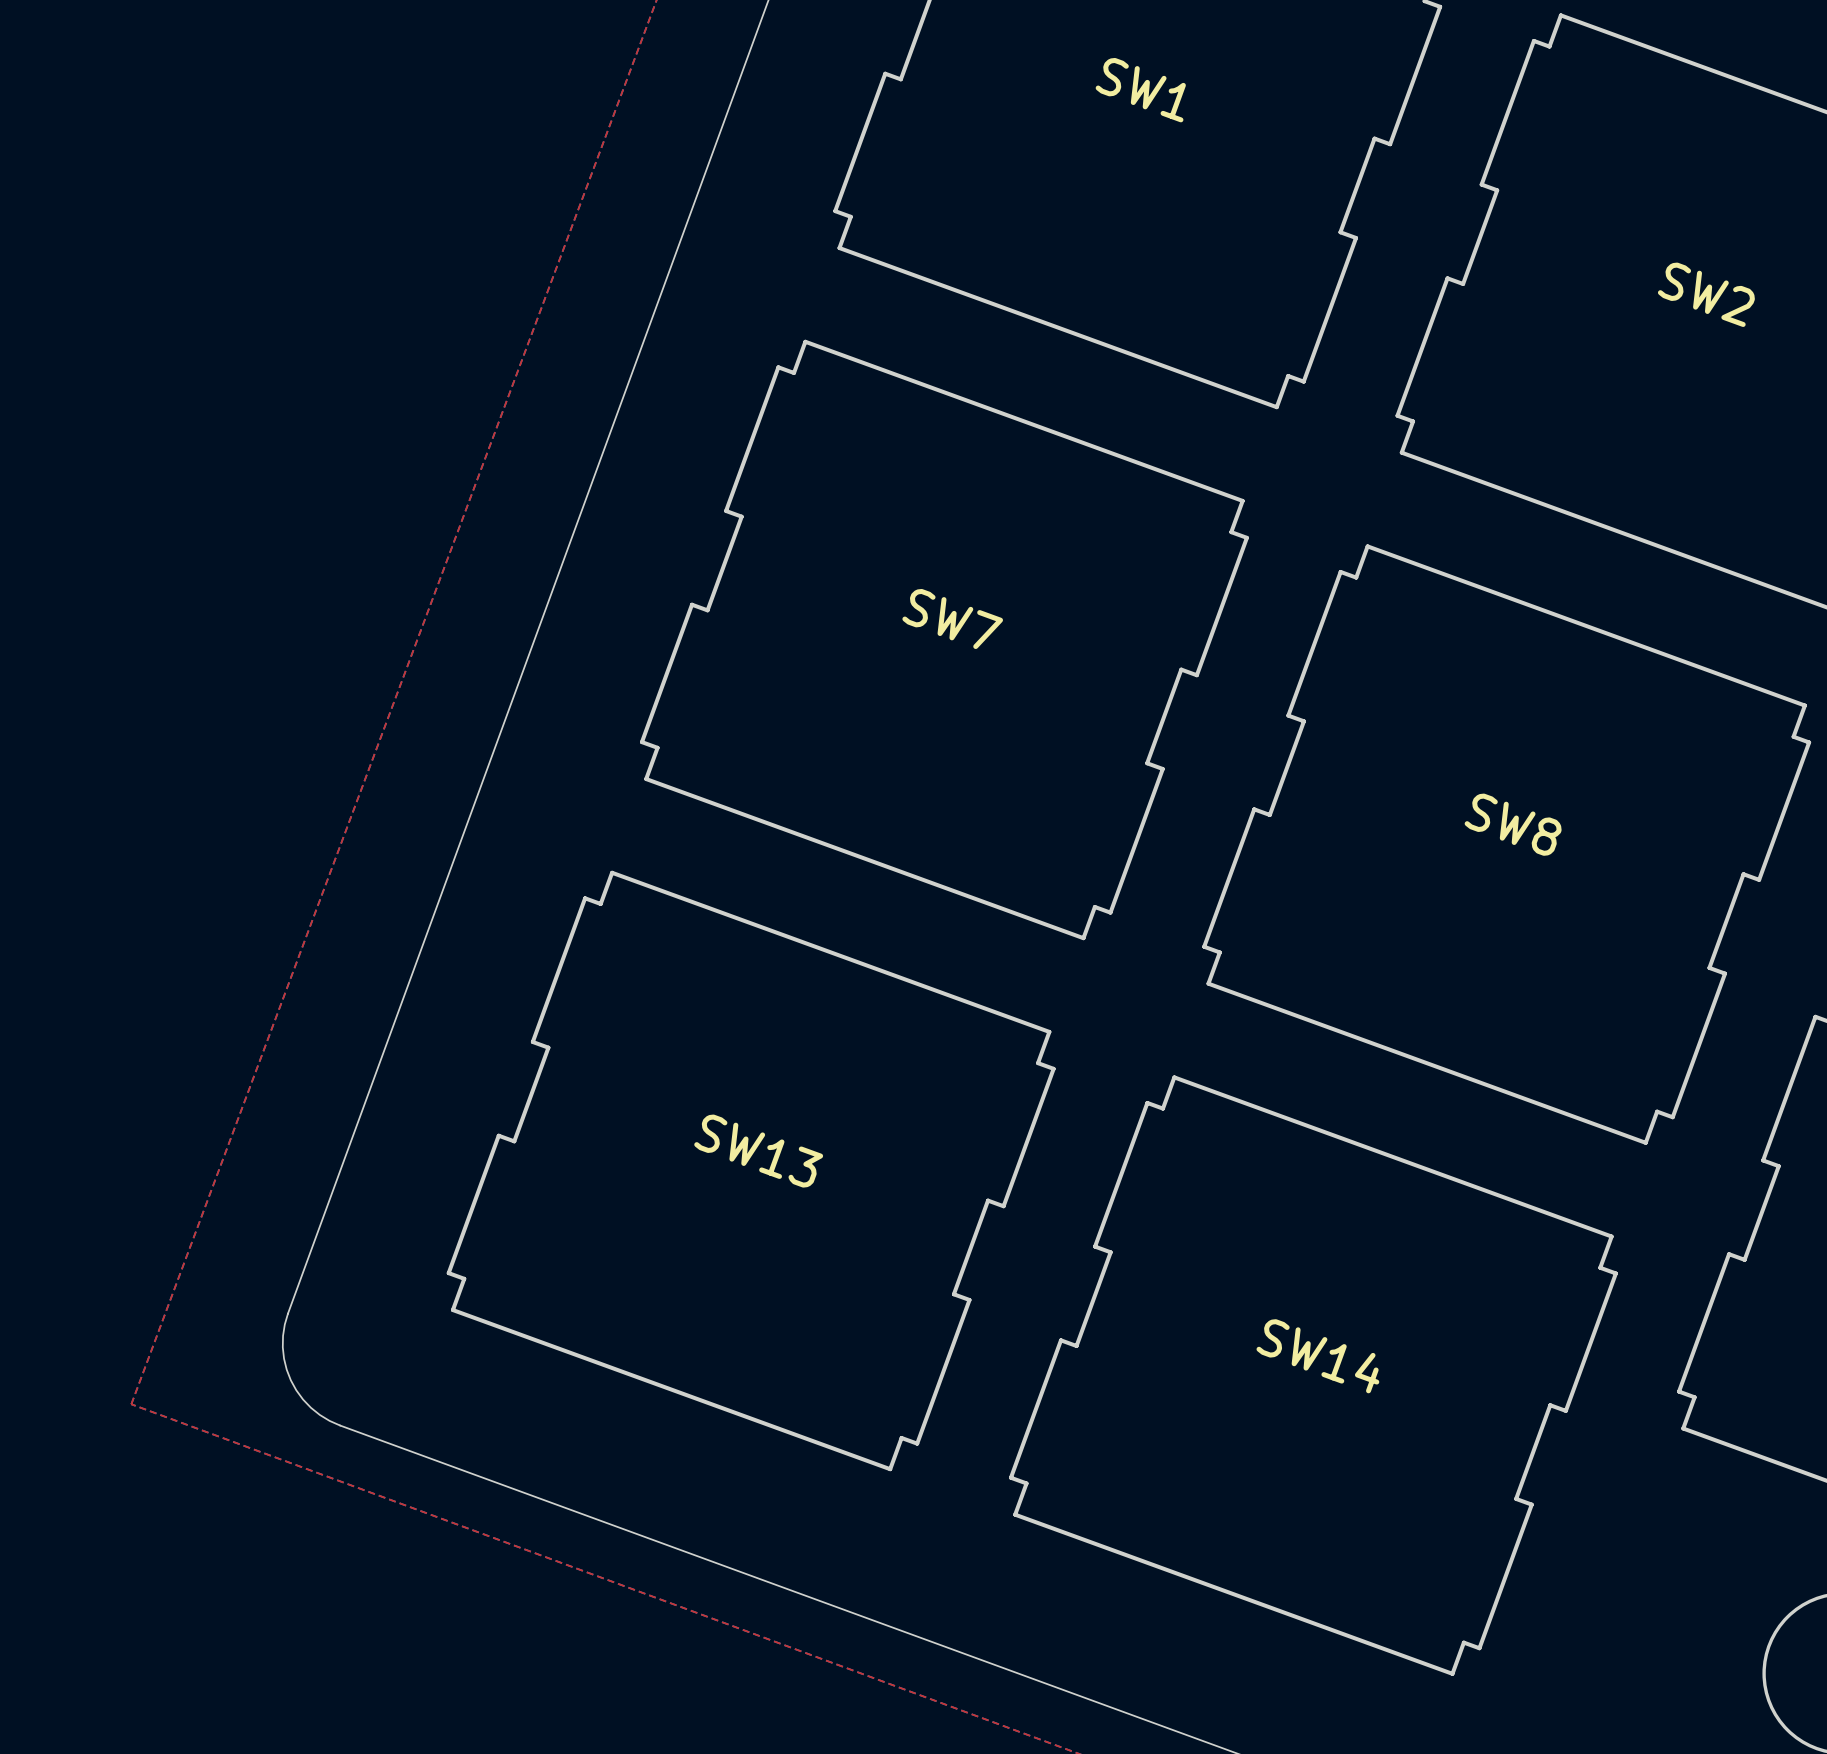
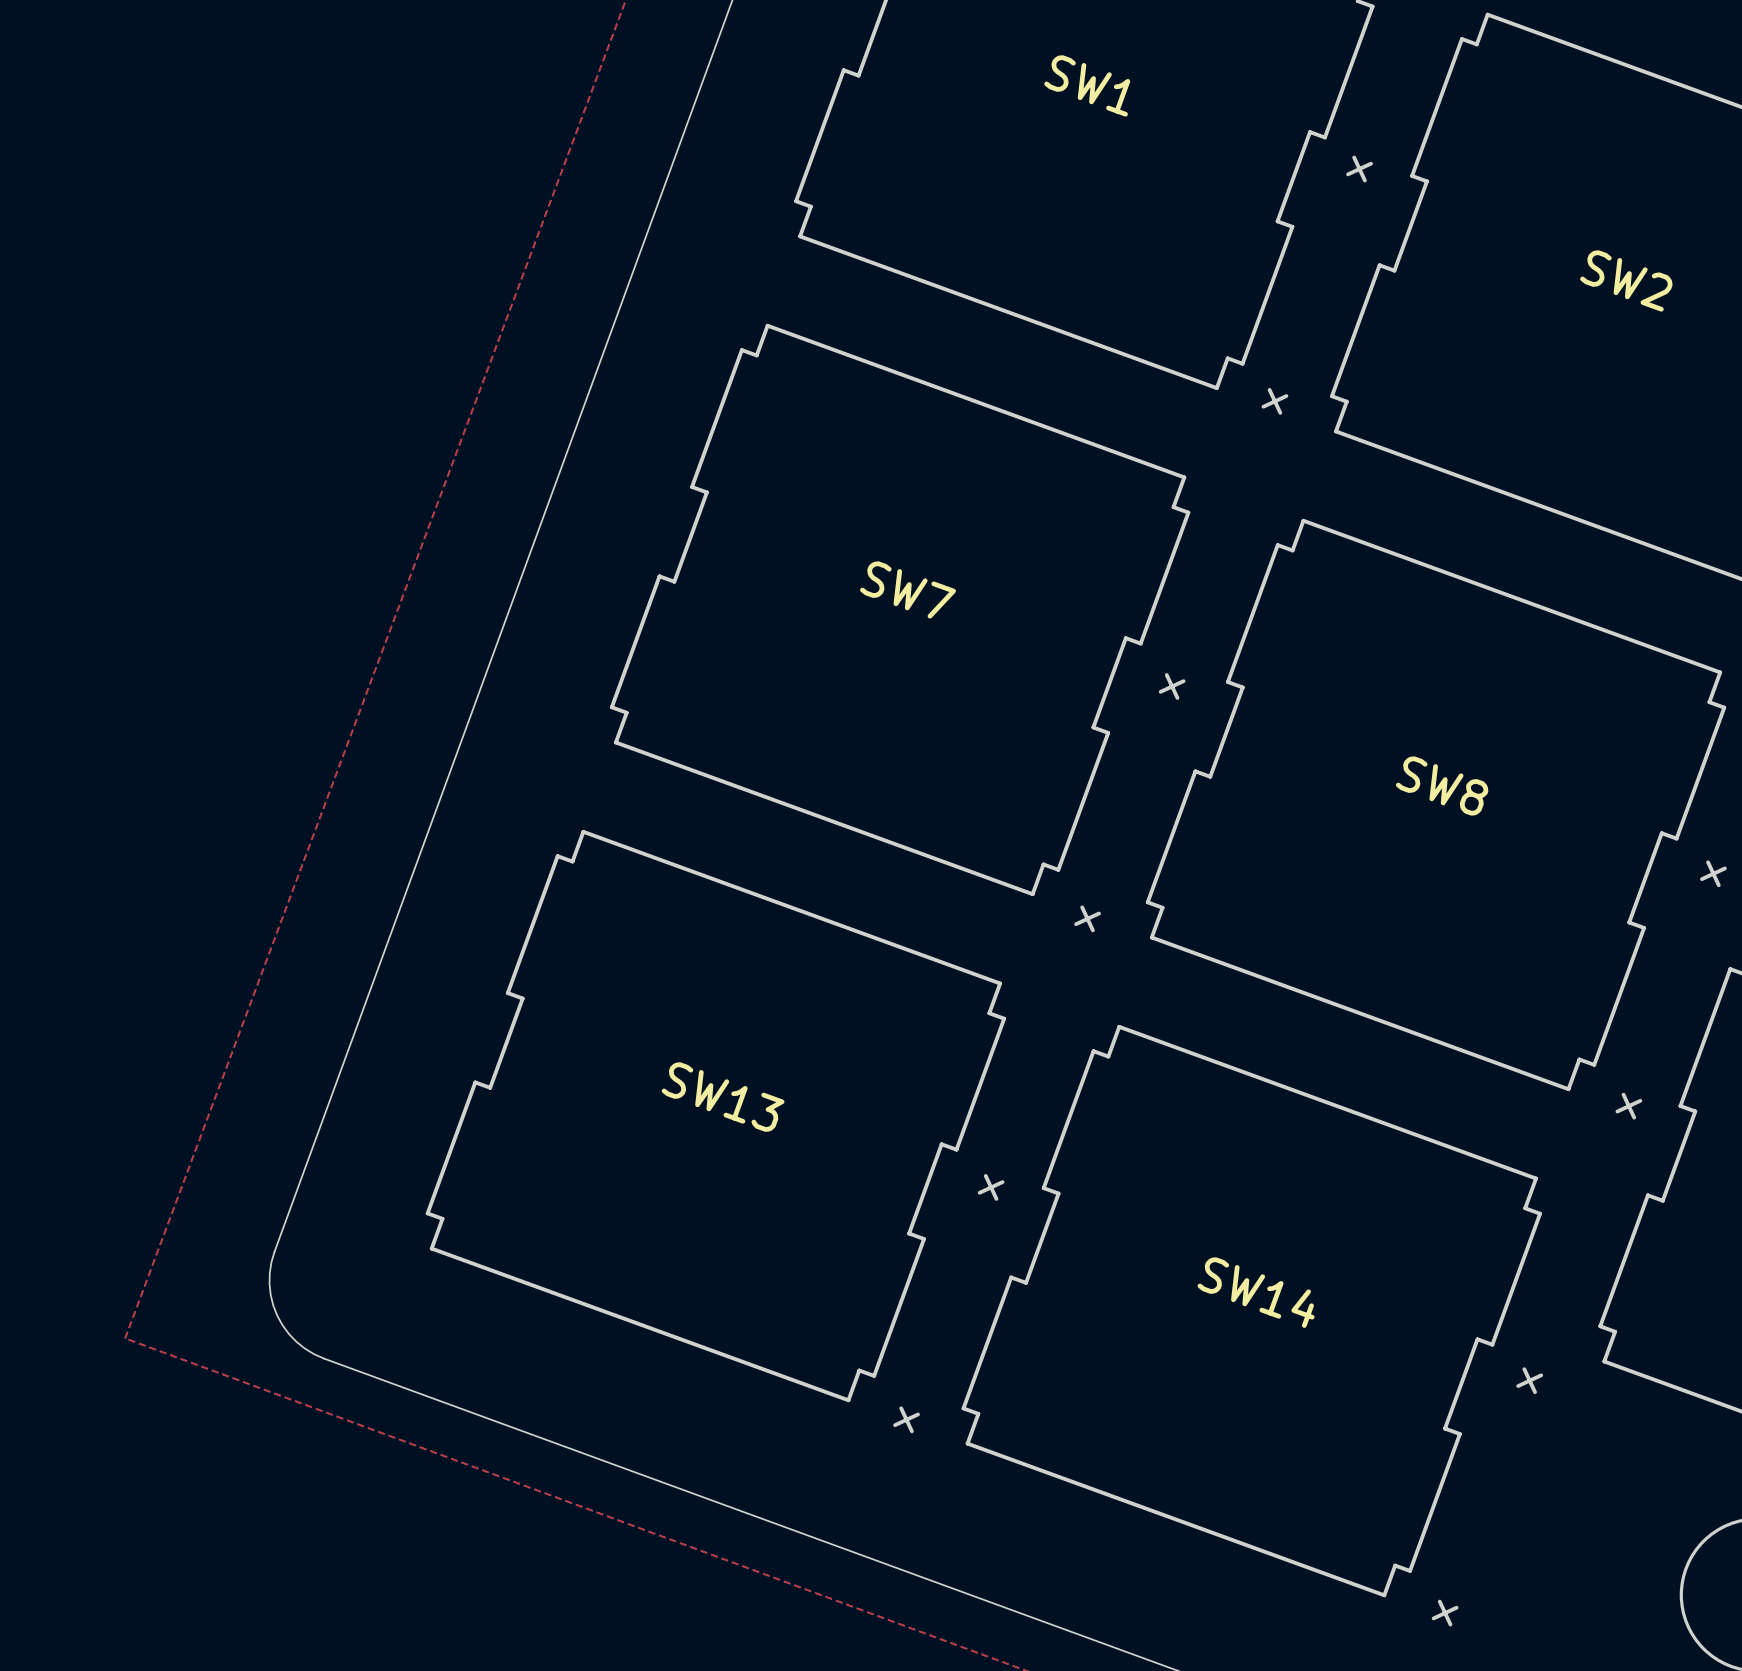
drawing: none -> [1261, 155, 1373, 415]
drawing: none -> [1074, 673, 1186, 933]
drawing: none -> [1615, 860, 1727, 1120]
drawing: none -> [893, 1174, 1005, 1434]
drawing: none -> [1431, 1367, 1544, 1627]

